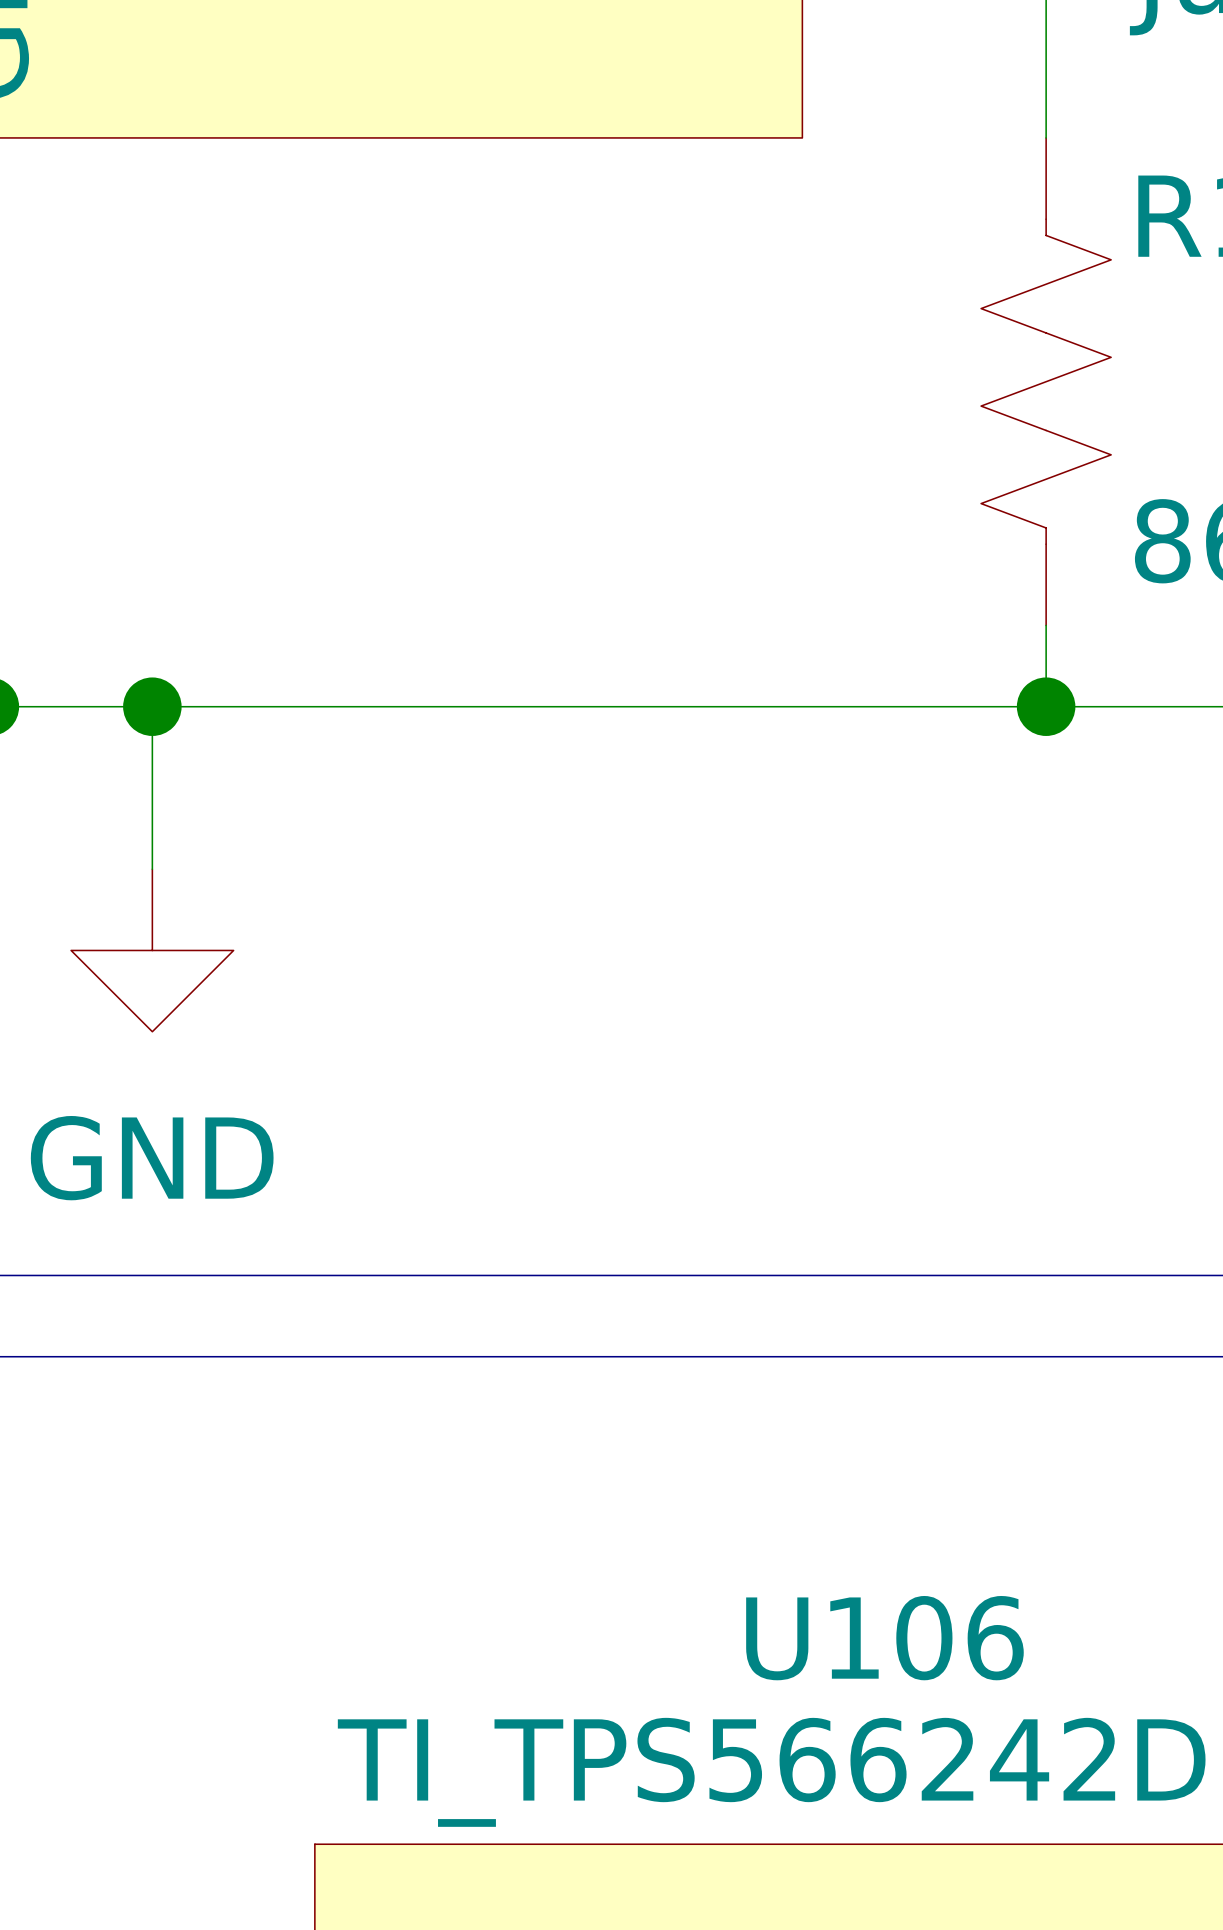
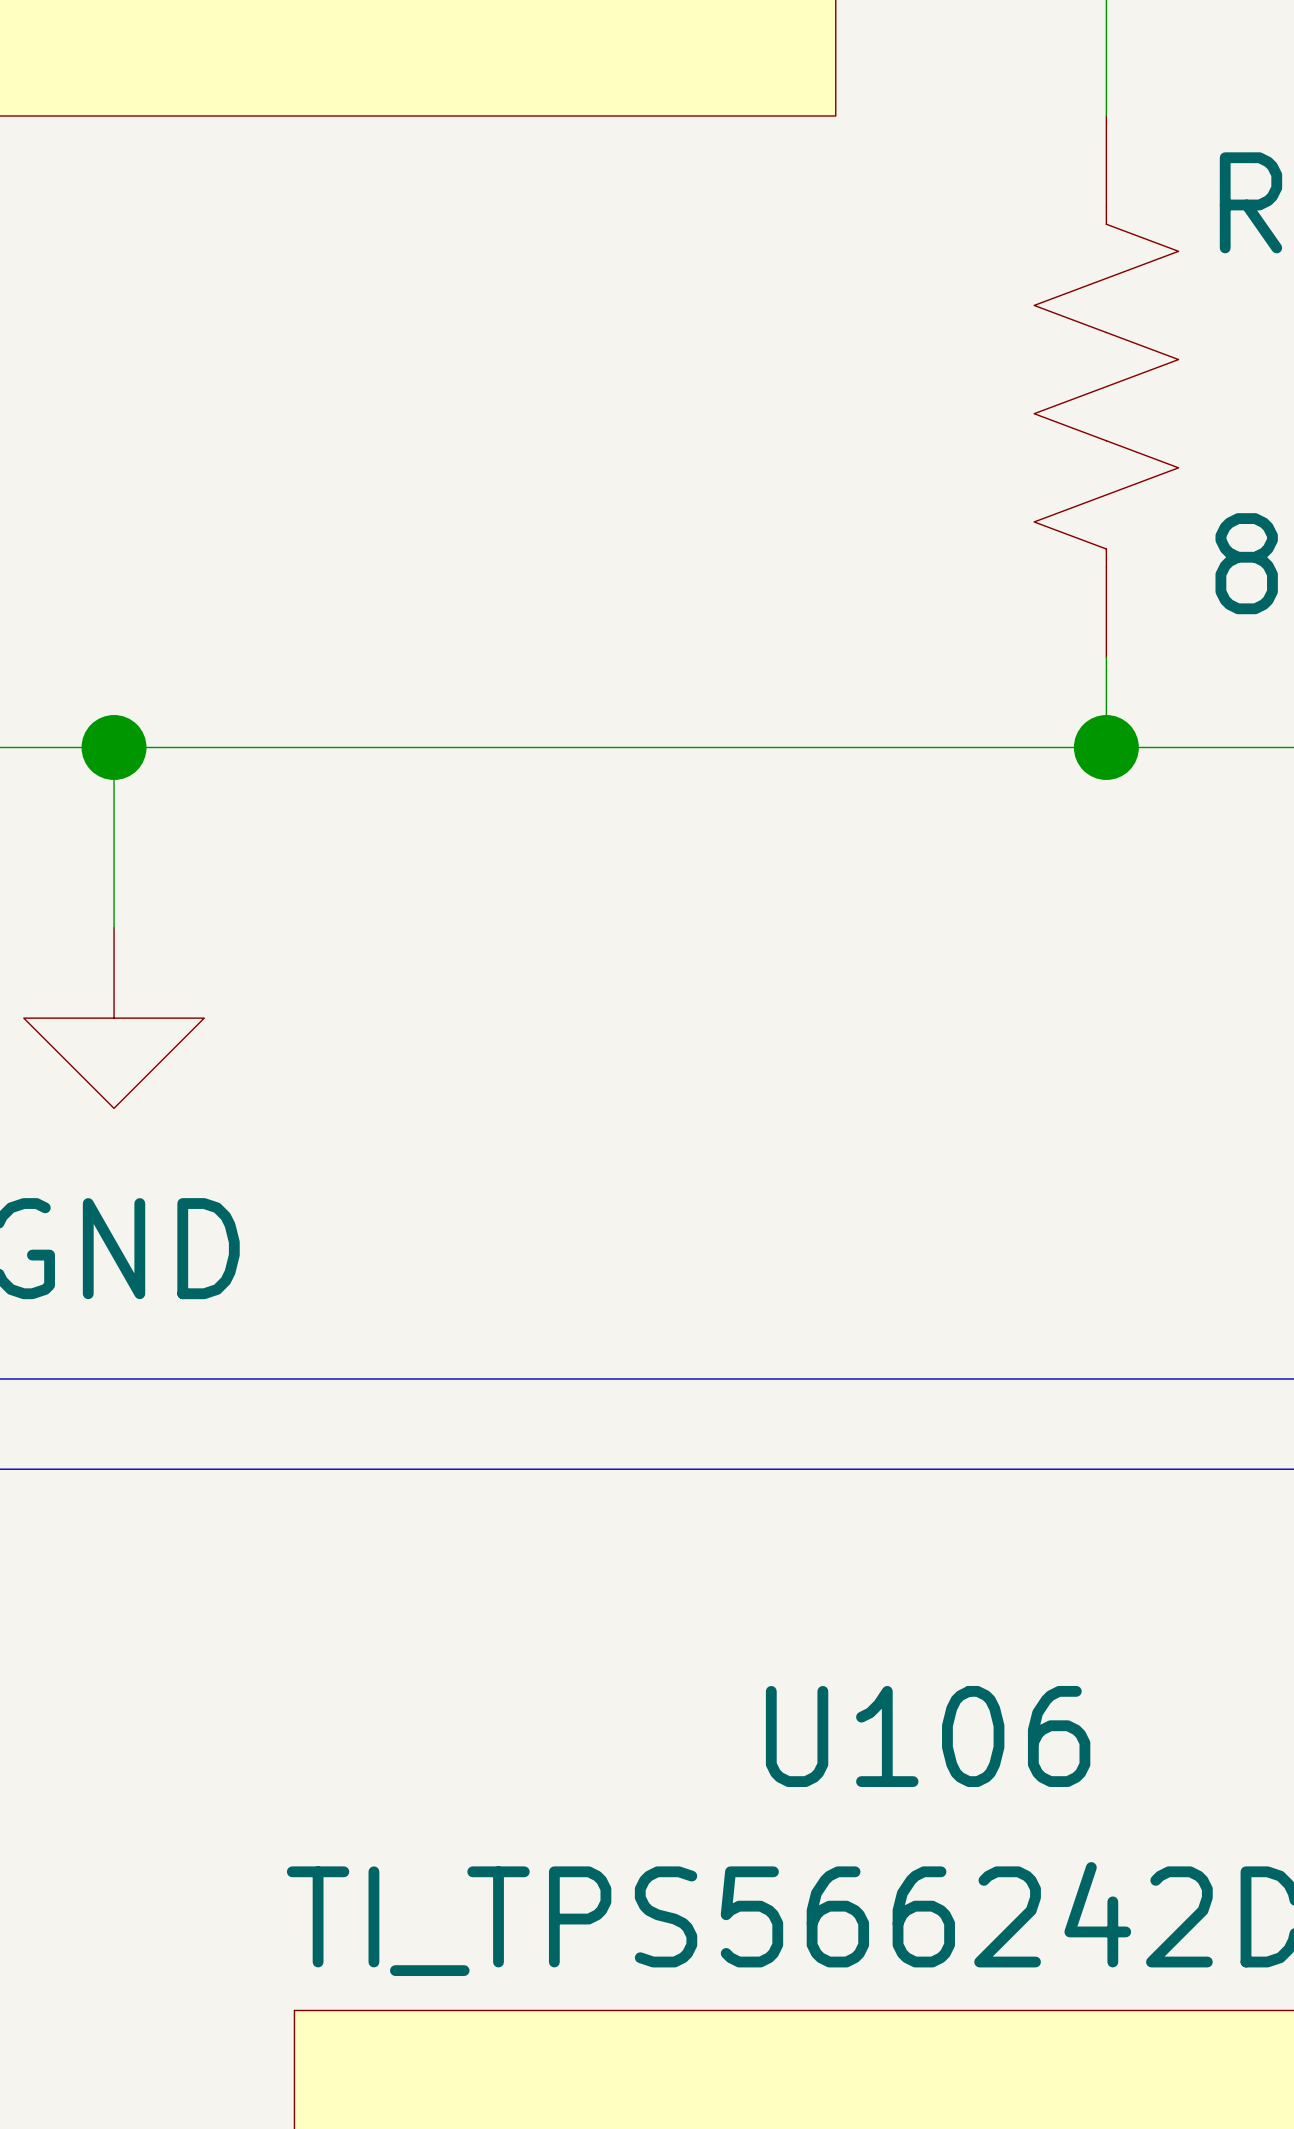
U106 name position: U106 (884, 1638) -> U106 (928, 1736)

